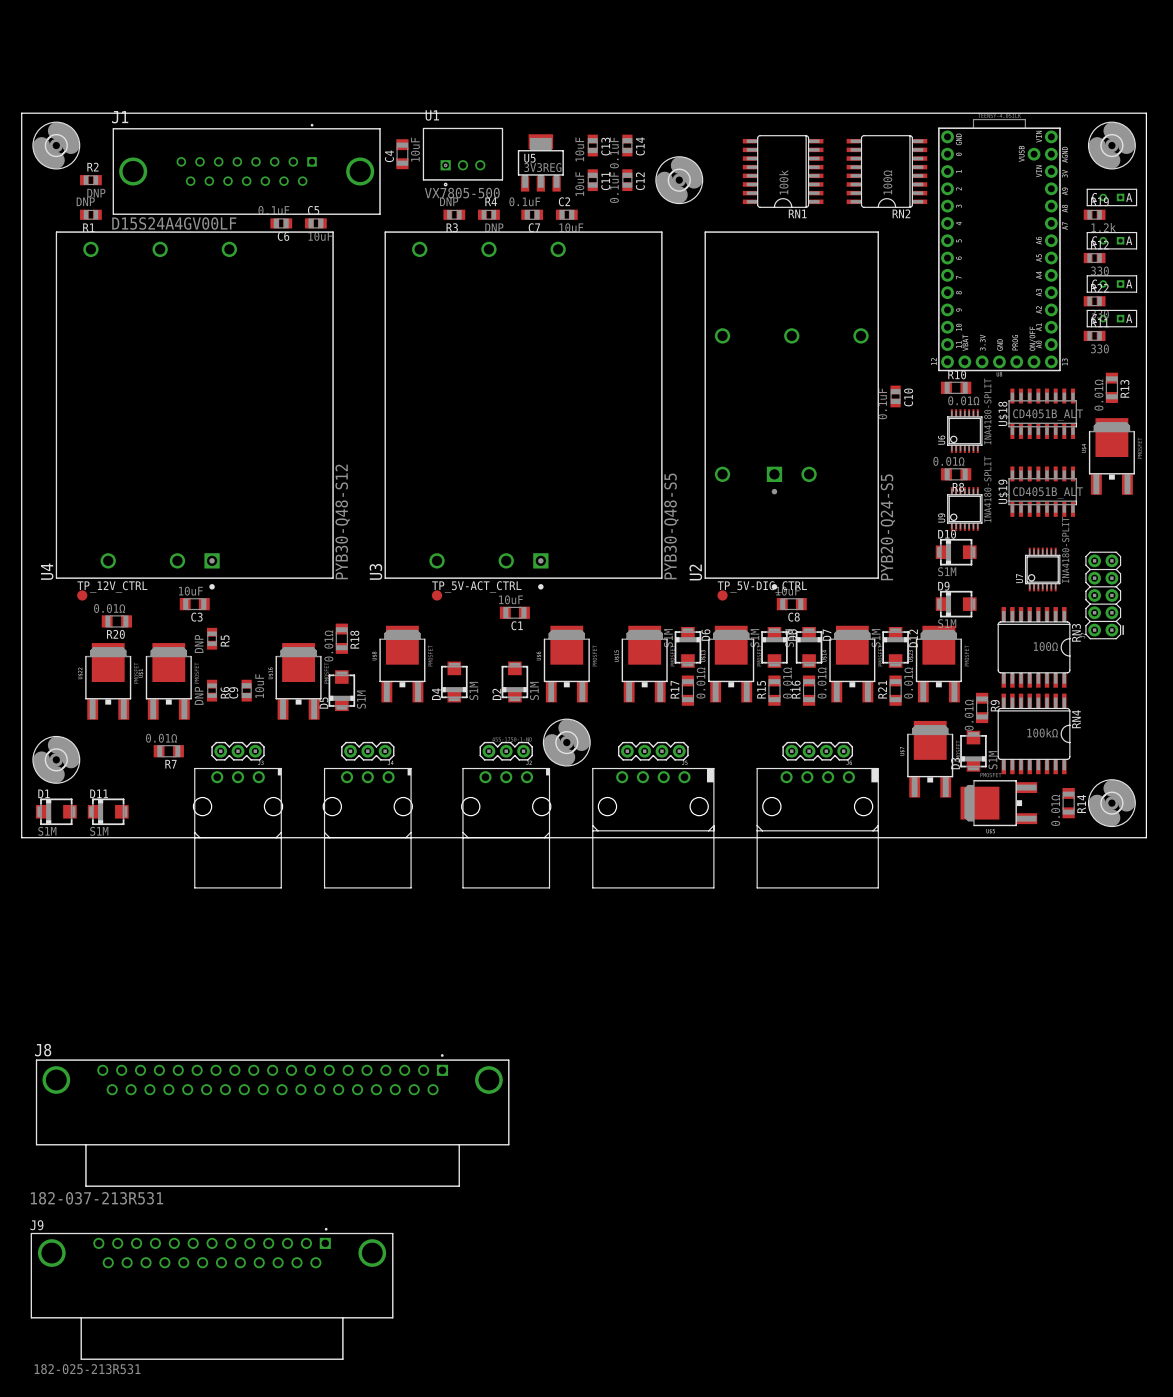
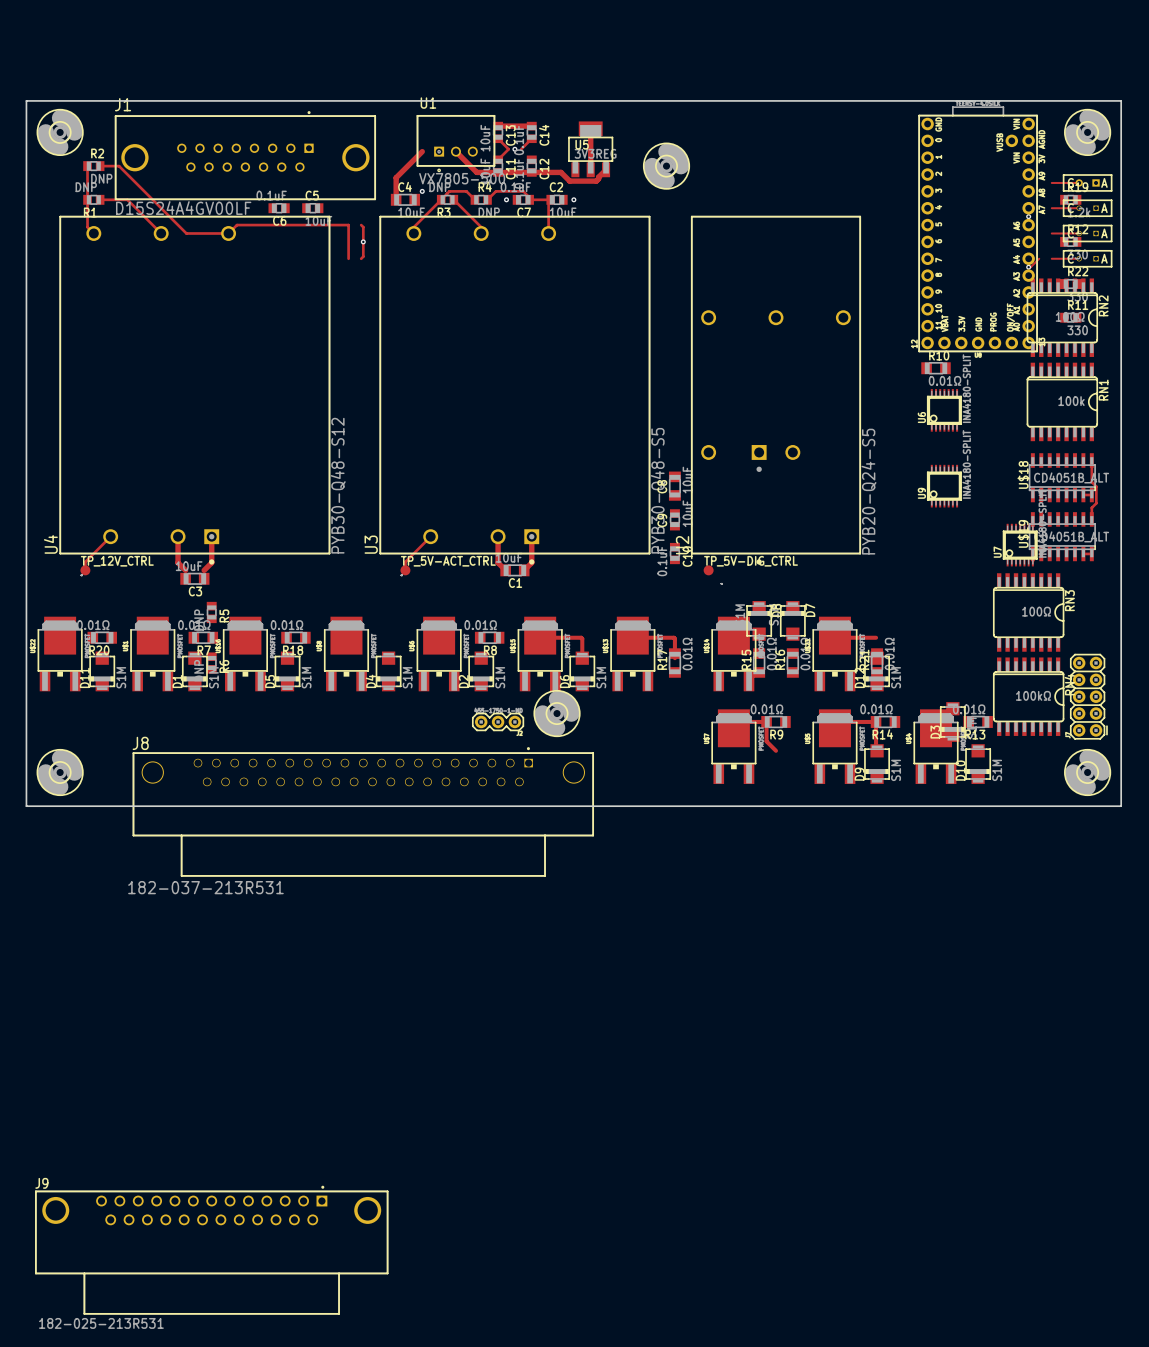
top track: none -> (498, 126) (531, 126)
top track: none -> (590, 128) (590, 169)
C13 position: (592, 145) -> (498, 132)
C14 position: (627, 145) -> (531, 132)
top track: none -> (498, 138) (508, 149) (498, 159)
top track: none -> (531, 138) (521, 149)
C4 rotation: 0° (402, 154) -> 90° clockwise (405, 199)
C4 position: (402, 154) -> (405, 199)
via: none -> (514, 149)
U5 position: (540, 162) -> (590, 149)
top track: none -> (422, 151) (396, 177) (396, 199)
top track: none -> (455, 151) (476, 172) (561, 172) (569, 181) (596, 181) (606, 169)
RN1 rotation: 0° (783, 171) -> 90° counterclockwise (1062, 401)
RN1 position: (783, 171) -> (1062, 401)
RN2 rotation: 0° (886, 171) -> 90° counterclockwise (1062, 317)
RN2 position: (886, 171) -> (1062, 317)
top track: none -> (87, 166) (87, 227) (93, 233)
top track: none -> (100, 166) (119, 166) (186, 233) (228, 233) (236, 225) (348, 225) (348, 258)
C11 position: (592, 180) -> (498, 166)
C12 position: (627, 180) -> (531, 166)
top track: none -> (1051, 182) (1079, 182)
via: none -> (422, 191)
top track: none -> (100, 199) (127, 199) (161, 233)
top track: none -> (453, 199) (481, 227) (481, 233)
top track: none -> (474, 199) (466, 191) (449, 191) (413, 227) (413, 233)
top track: none -> (487, 199) (495, 191) (523, 191) (529, 199) (550, 199) (548, 201) (548, 233)
via: none -> (506, 199)
via: none -> (573, 199)
top track: none -> (1051, 208) (1079, 208)
part: none -> (1087, 208)
via: none -> (1028, 216)
top track: none -> (361, 225) (363, 227) (363, 256) (361, 258)
part: (1111, 240) -> none
top track: none -> (1051, 233) (1079, 233)
part: none -> (1087, 233)
via: none -> (363, 241)
top track: none -> (1039, 258) (1028, 267)
top track: none -> (1051, 258) (1079, 258)
part: none -> (1087, 258)
via: none -> (1028, 267)
part: (1111, 283) -> none
part: (1111, 318) -> none
R13 rotation: 0° (1111, 387) -> 90° clockwise (978, 721)
R13 position: (1111, 387) -> (978, 721)
C10 position: (895, 396) -> (674, 553)
U$18 position: (1042, 413) -> (1062, 477)
part position: (1111, 456) -> (936, 746)
R8 position: (956, 474) -> (489, 637)
top track: none -> (1091, 460) (1091, 482) (1096, 486) (1096, 503) (1091, 507) (1091, 519)
U$19 position: (1042, 491) -> (1062, 536)
top track: none -> (1083, 494) (1091, 494)
D10 rotation: 0° (956, 552) -> 90° counterclockwise (978, 764)
D10 position: (956, 552) -> (978, 764)
top track: none -> (110, 536) (85, 561) (85, 570)
top track: none -> (178, 536) (178, 562) (185, 570)
top track: none -> (211, 536) (211, 562) (204, 570)
top track: none -> (430, 536) (405, 561) (405, 570)
top track: none -> (498, 536) (498, 562) (505, 570)
top track: none -> (531, 536) (531, 562) (524, 570)
top track: none -> (1083, 553) (1091, 553)
TP_5V-ACT_CTRL position: (437, 595) -> (405, 570)
part position: (1104, 595) -> (1088, 696)
C8 rotation: 0° (791, 604) -> 90° clockwise (674, 486)
C8 position: (791, 604) -> (674, 486)
D9 rotation: 0° (956, 604) -> 90° counterclockwise (877, 764)
D9 position: (956, 604) -> (877, 764)
C1 position: (514, 612) -> (514, 570)
R20 position: (116, 621) -> (102, 637)
R18 rotation: 0° (341, 638) -> 90° clockwise (295, 637)
R18 position: (341, 638) -> (295, 637)
D6 rotation: 0° (687, 647) -> 180° (582, 671)
D6 position: (687, 647) -> (582, 671)
D12 rotation: 0° (895, 647) -> 180° (877, 671)
D12 position: (895, 647) -> (877, 671)
RN3 position: (1034, 647) -> (1028, 612)
part position: (402, 664) -> (346, 654)
top track: none -> (548, 637) (581, 637) (582, 658)
part position: (566, 664) -> (439, 654)
part position: (644, 664) -> (540, 654)
top track: none -> (641, 637) (673, 637) (674, 658)
part position: (731, 664) -> (632, 654)
top track: none -> (834, 637) (876, 637)
part position: (852, 664) -> (733, 654)
part position: (938, 664) -> (834, 654)
part position: (108, 681) -> (60, 654)
part position: (168, 681) -> (152, 654)
part position: (298, 681) -> (245, 654)
D4 position: (454, 681) -> (388, 671)
D2 position: (514, 681) -> (481, 671)
C9 position: (246, 690) -> (674, 519)
D5 position: (341, 690) -> (287, 671)
R9 rotation: 0° (982, 707) -> 90° clockwise (776, 721)
R9 position: (982, 707) -> (776, 721)
RN4 position: (1034, 733) -> (1028, 696)
R7 position: (168, 751) -> (203, 637)
part: (238, 751) -> none
part: (367, 751) -> none
part: (653, 751) -> none
top track: none -> (742, 721) (766, 721) (766, 741) (776, 750)
part: (817, 751) -> none
top track: none -> (843, 721) (876, 721) (877, 750)
part position: (56, 759) -> (60, 772)
part position: (930, 759) -> (733, 746)
part rotation: 0° (998, 803) -> 90° clockwise (834, 746)
part position: (998, 803) -> (834, 746)
R14 rotation: 0° (1068, 803) -> 90° clockwise (885, 721)
R14 position: (1068, 803) -> (885, 721)
D1 rotation: 0° (56, 811) -> 90° counterclockwise (194, 671)
D1 position: (56, 811) -> (194, 671)
D11 rotation: 0° (108, 811) -> 90° counterclockwise (102, 671)
D11 position: (108, 811) -> (102, 671)
part: (238, 828) -> none
part: (367, 828) -> none
part: (506, 828) -> none
part: (653, 828) -> none
part: (817, 828) -> none
J8 footprint: [35, 1054, 510, 1187] -> [132, 747, 594, 877]

